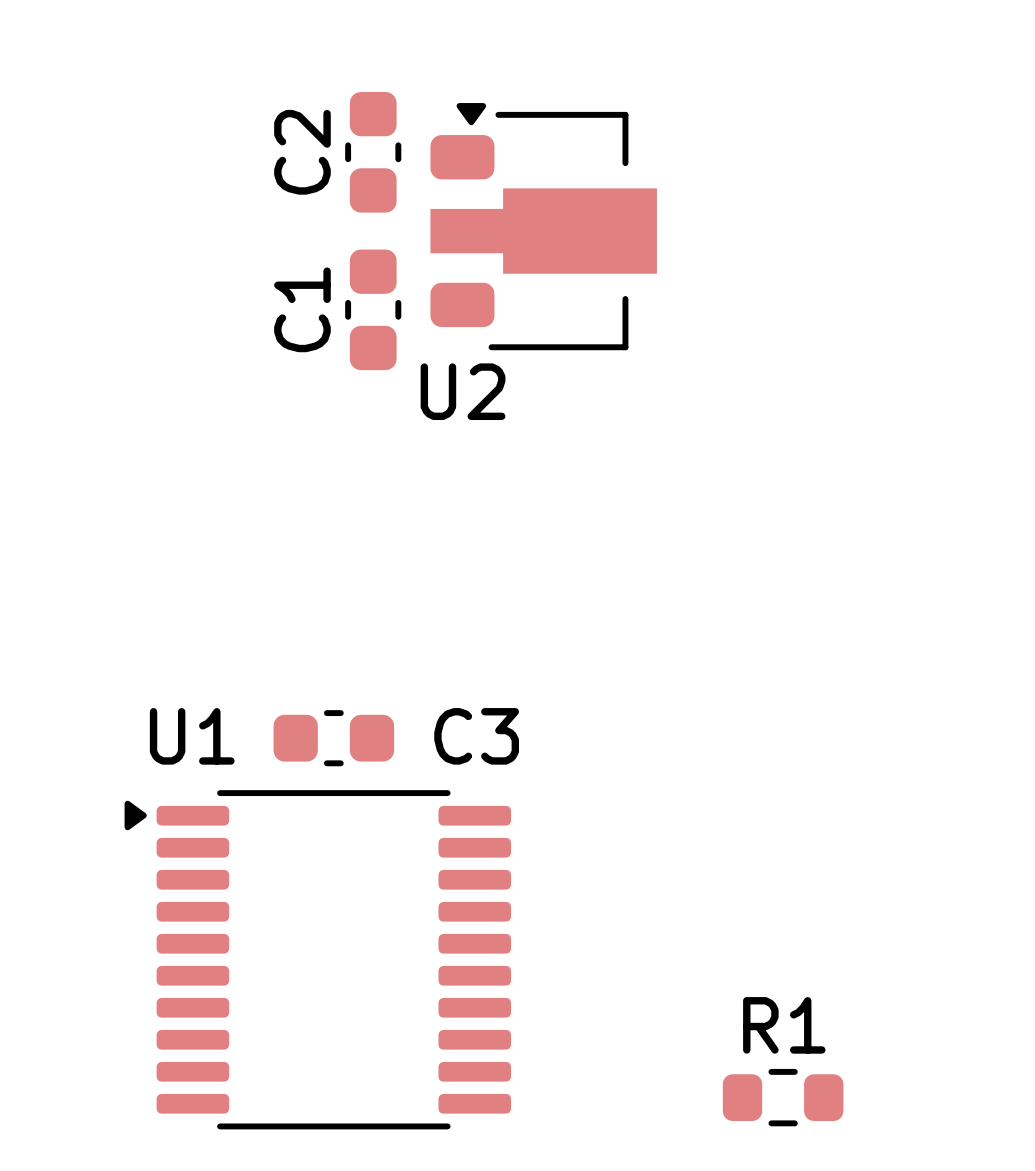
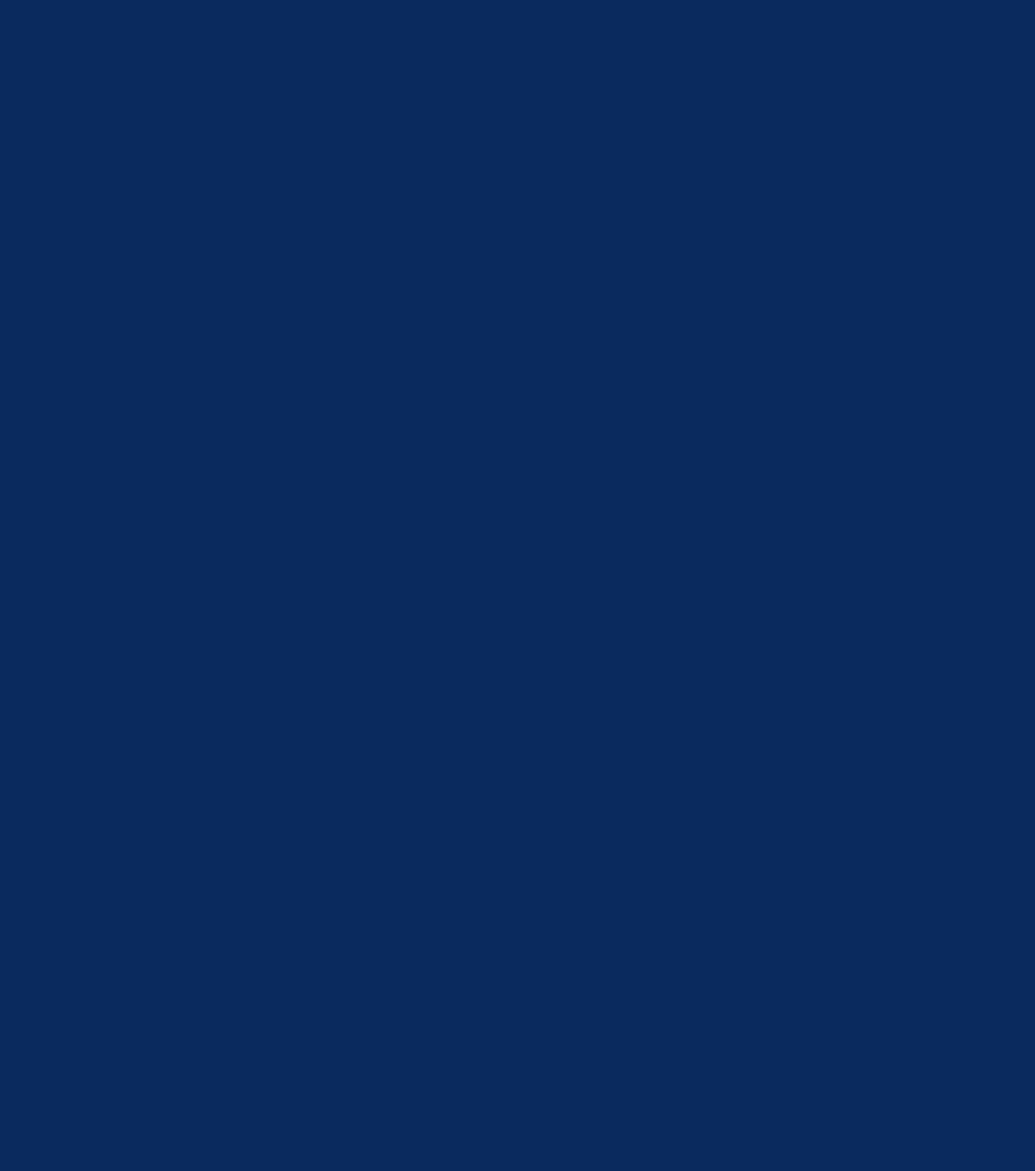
C2: (373, 152) -> none
U2: (543, 226) -> none
C1: (373, 309) -> none
C3: (333, 738) -> none
U1: (317, 959) -> none
R1: (783, 1097) -> none

